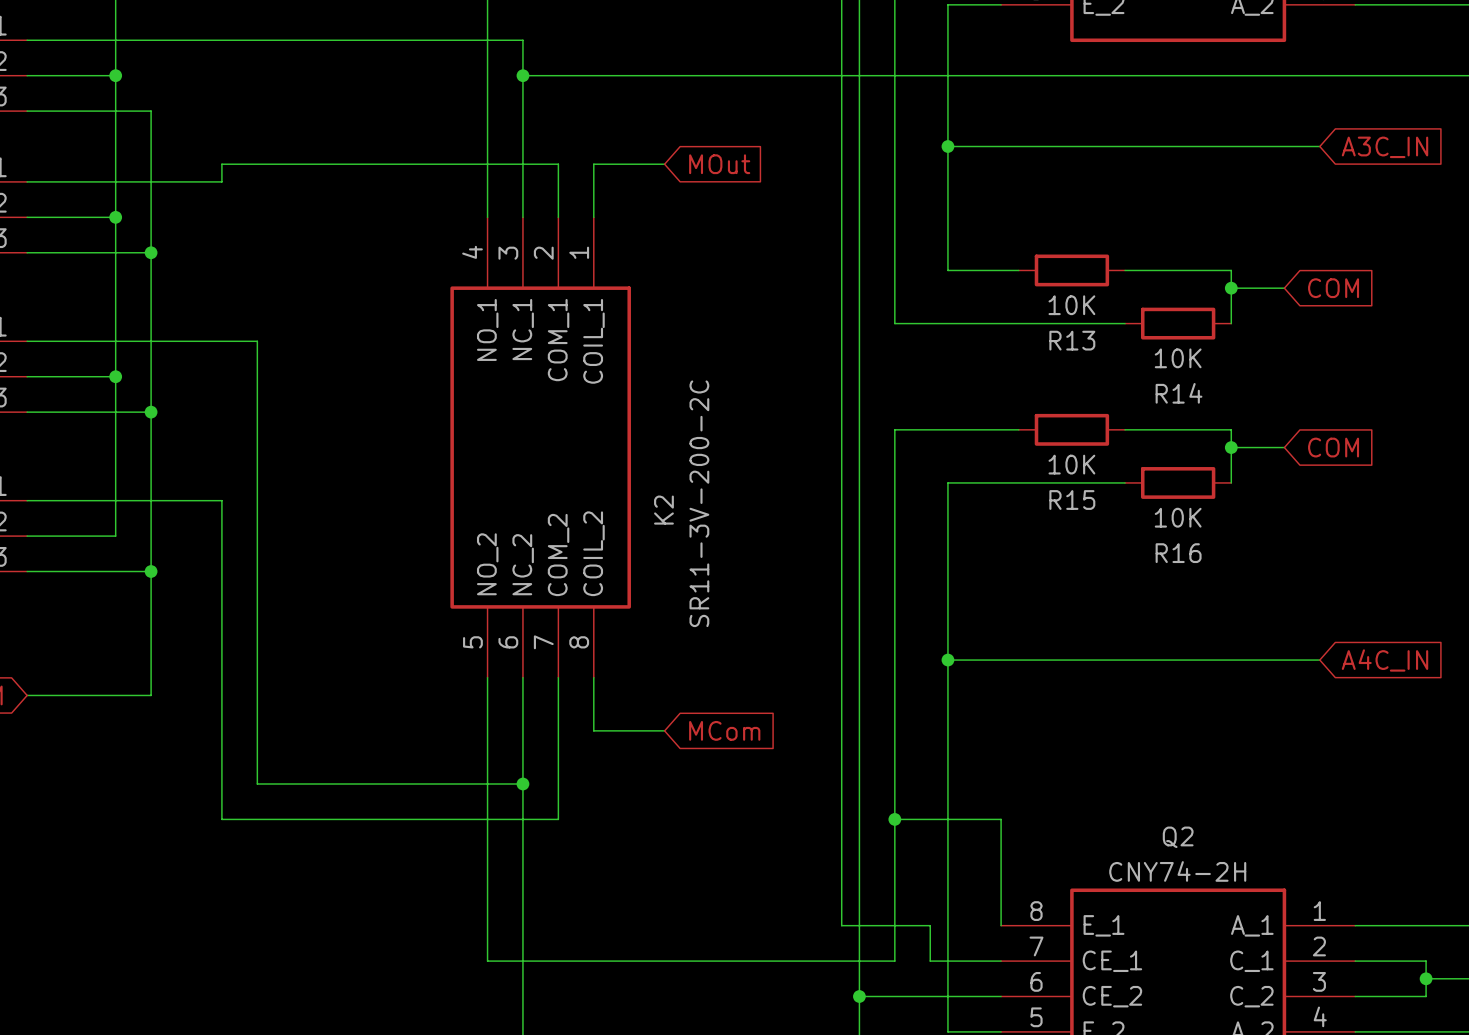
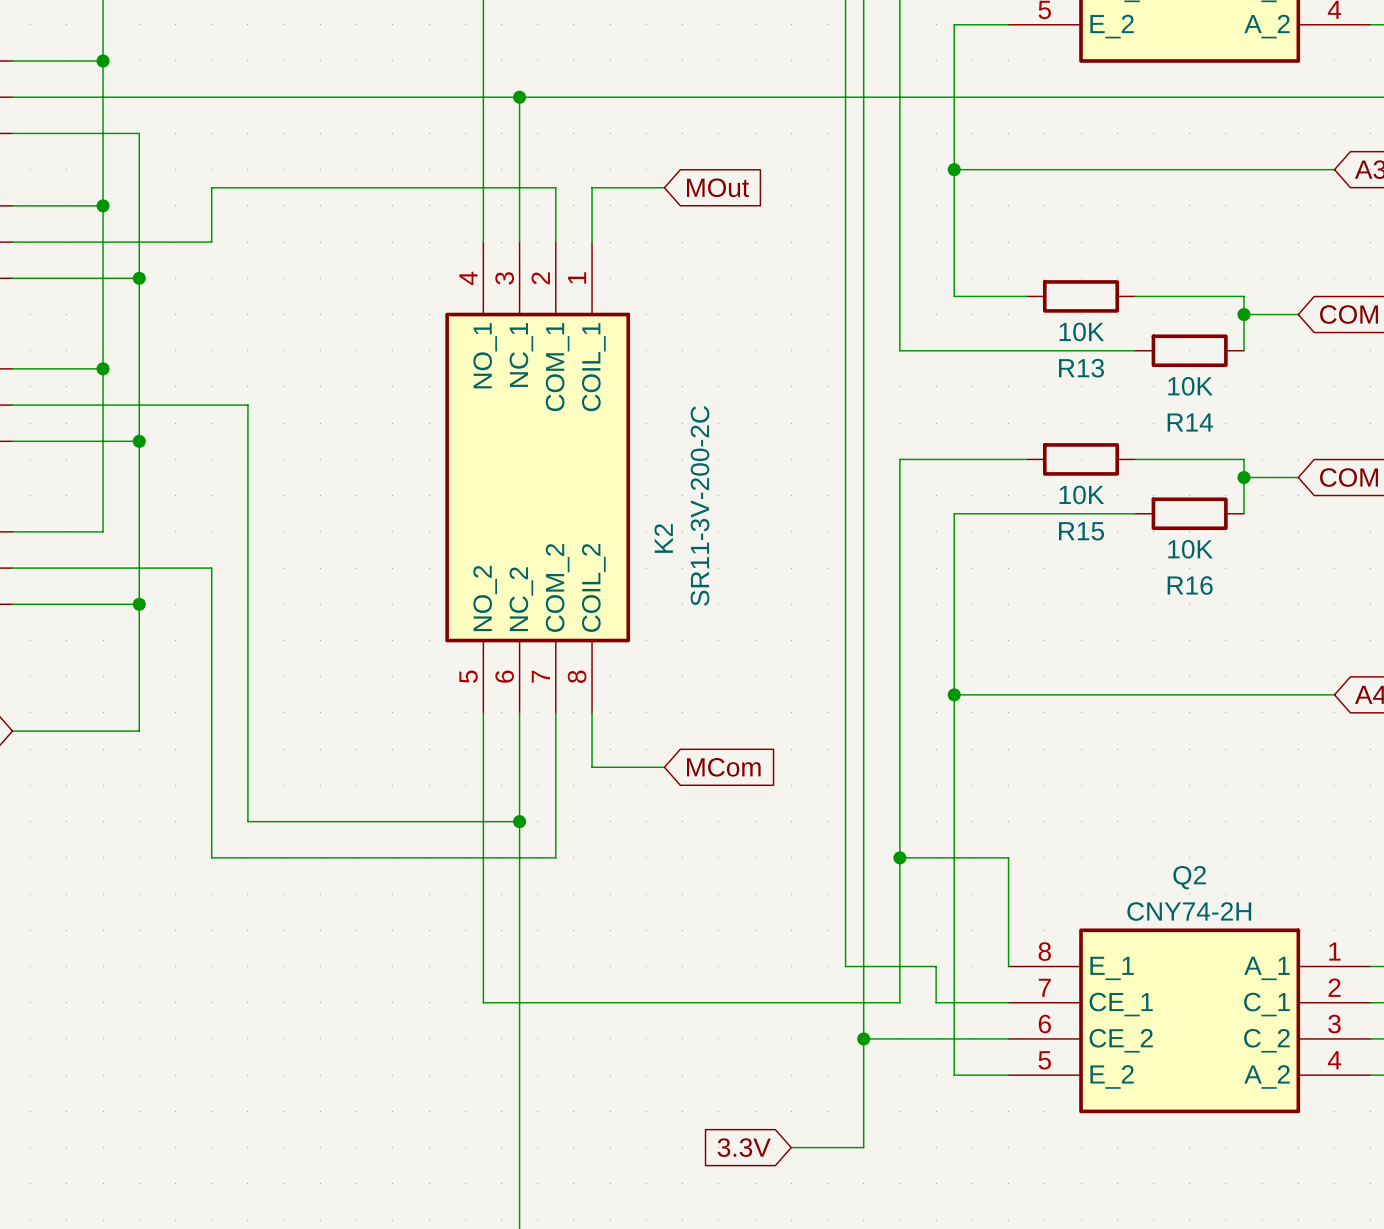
wire: (115, 40) (522, 40) (522, 75) -> (103, 97) (519, 97)
junction position: (115, 75) -> (103, 60)
wire: (115, 181) (221, 181) -> (103, 242) (211, 242) (211, 205)
junction position: (115, 217) -> (103, 205)
wire: (115, 341) (257, 341) (257, 376) -> (103, 405) (247, 405)
junction position: (115, 376) -> (103, 368)
wire: (115, 536) (115, 500) (221, 500) (221, 536) -> (103, 568) (211, 568)

